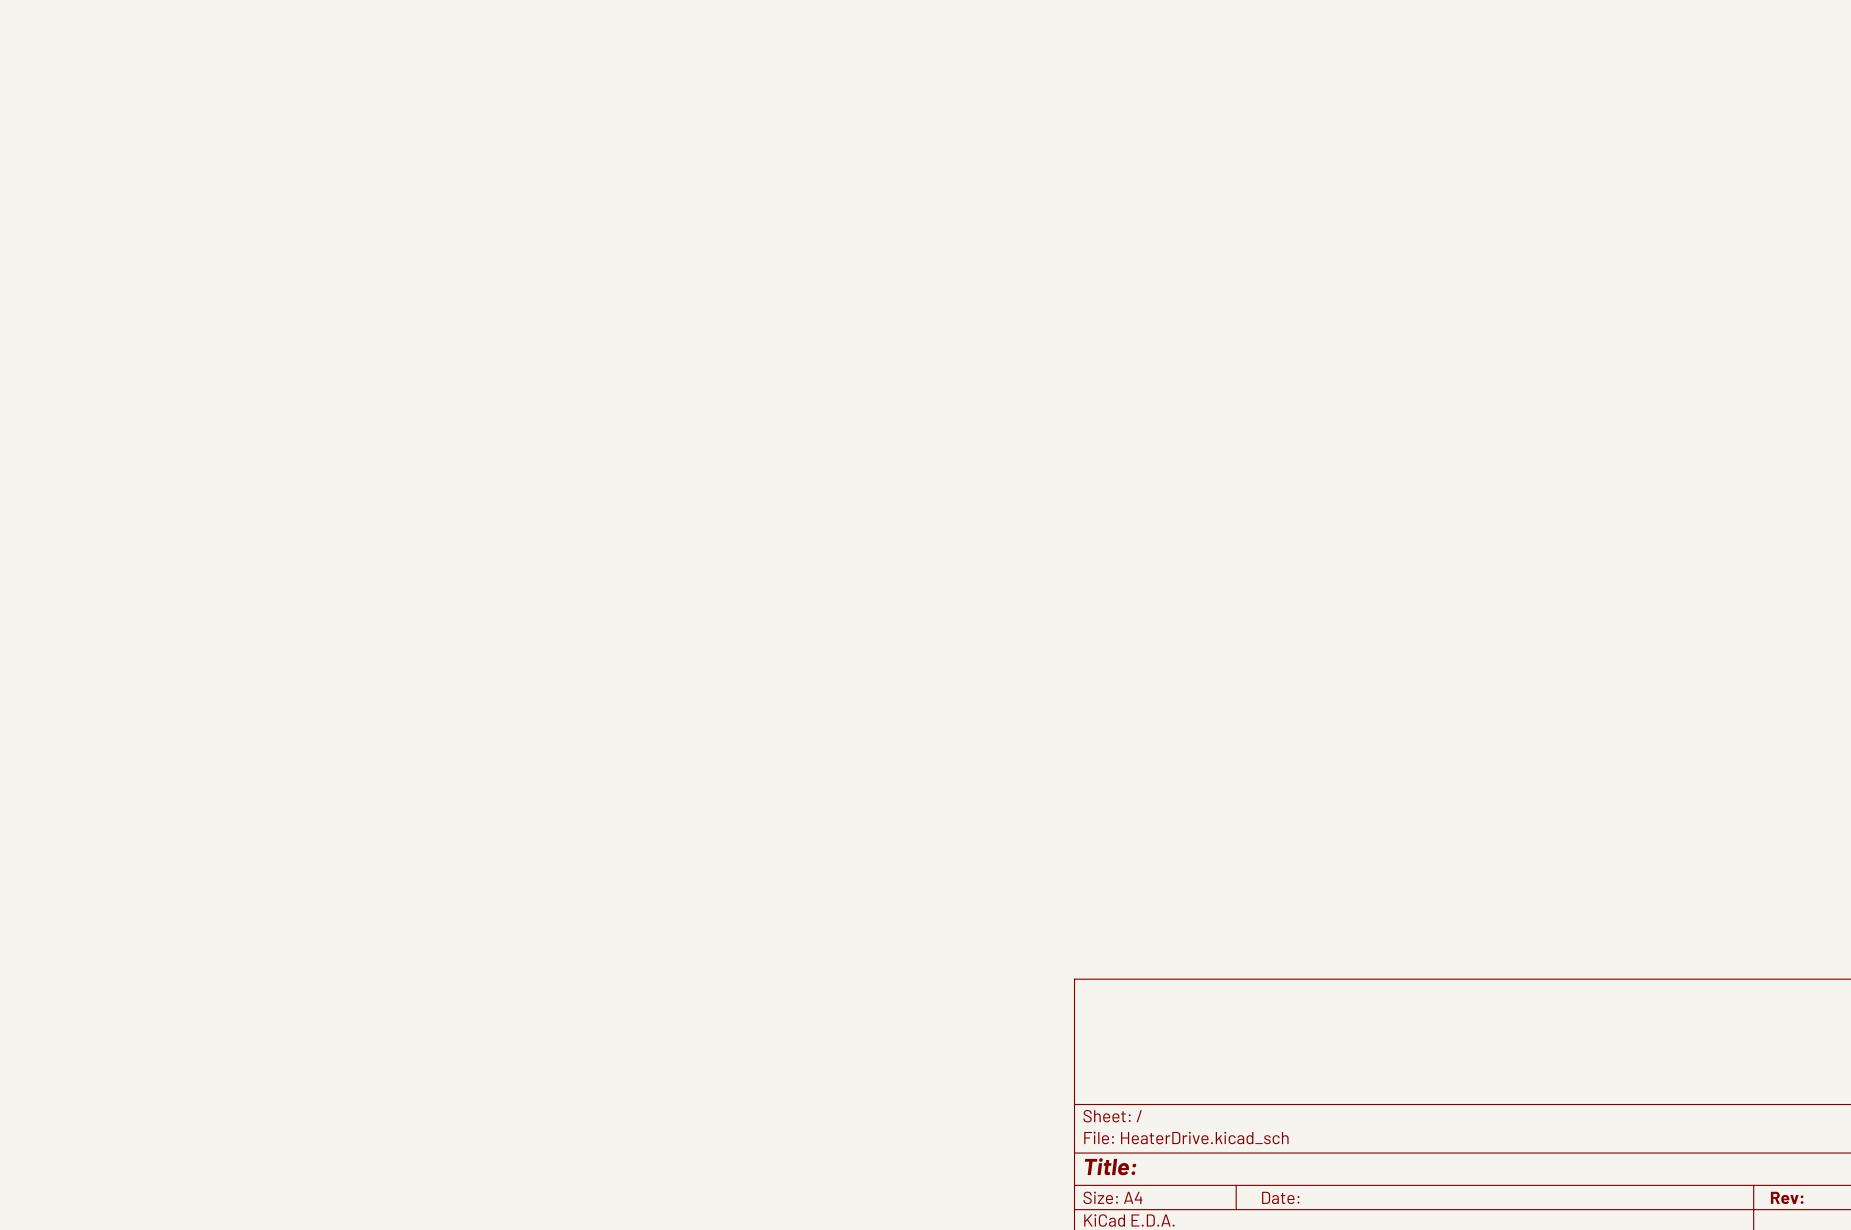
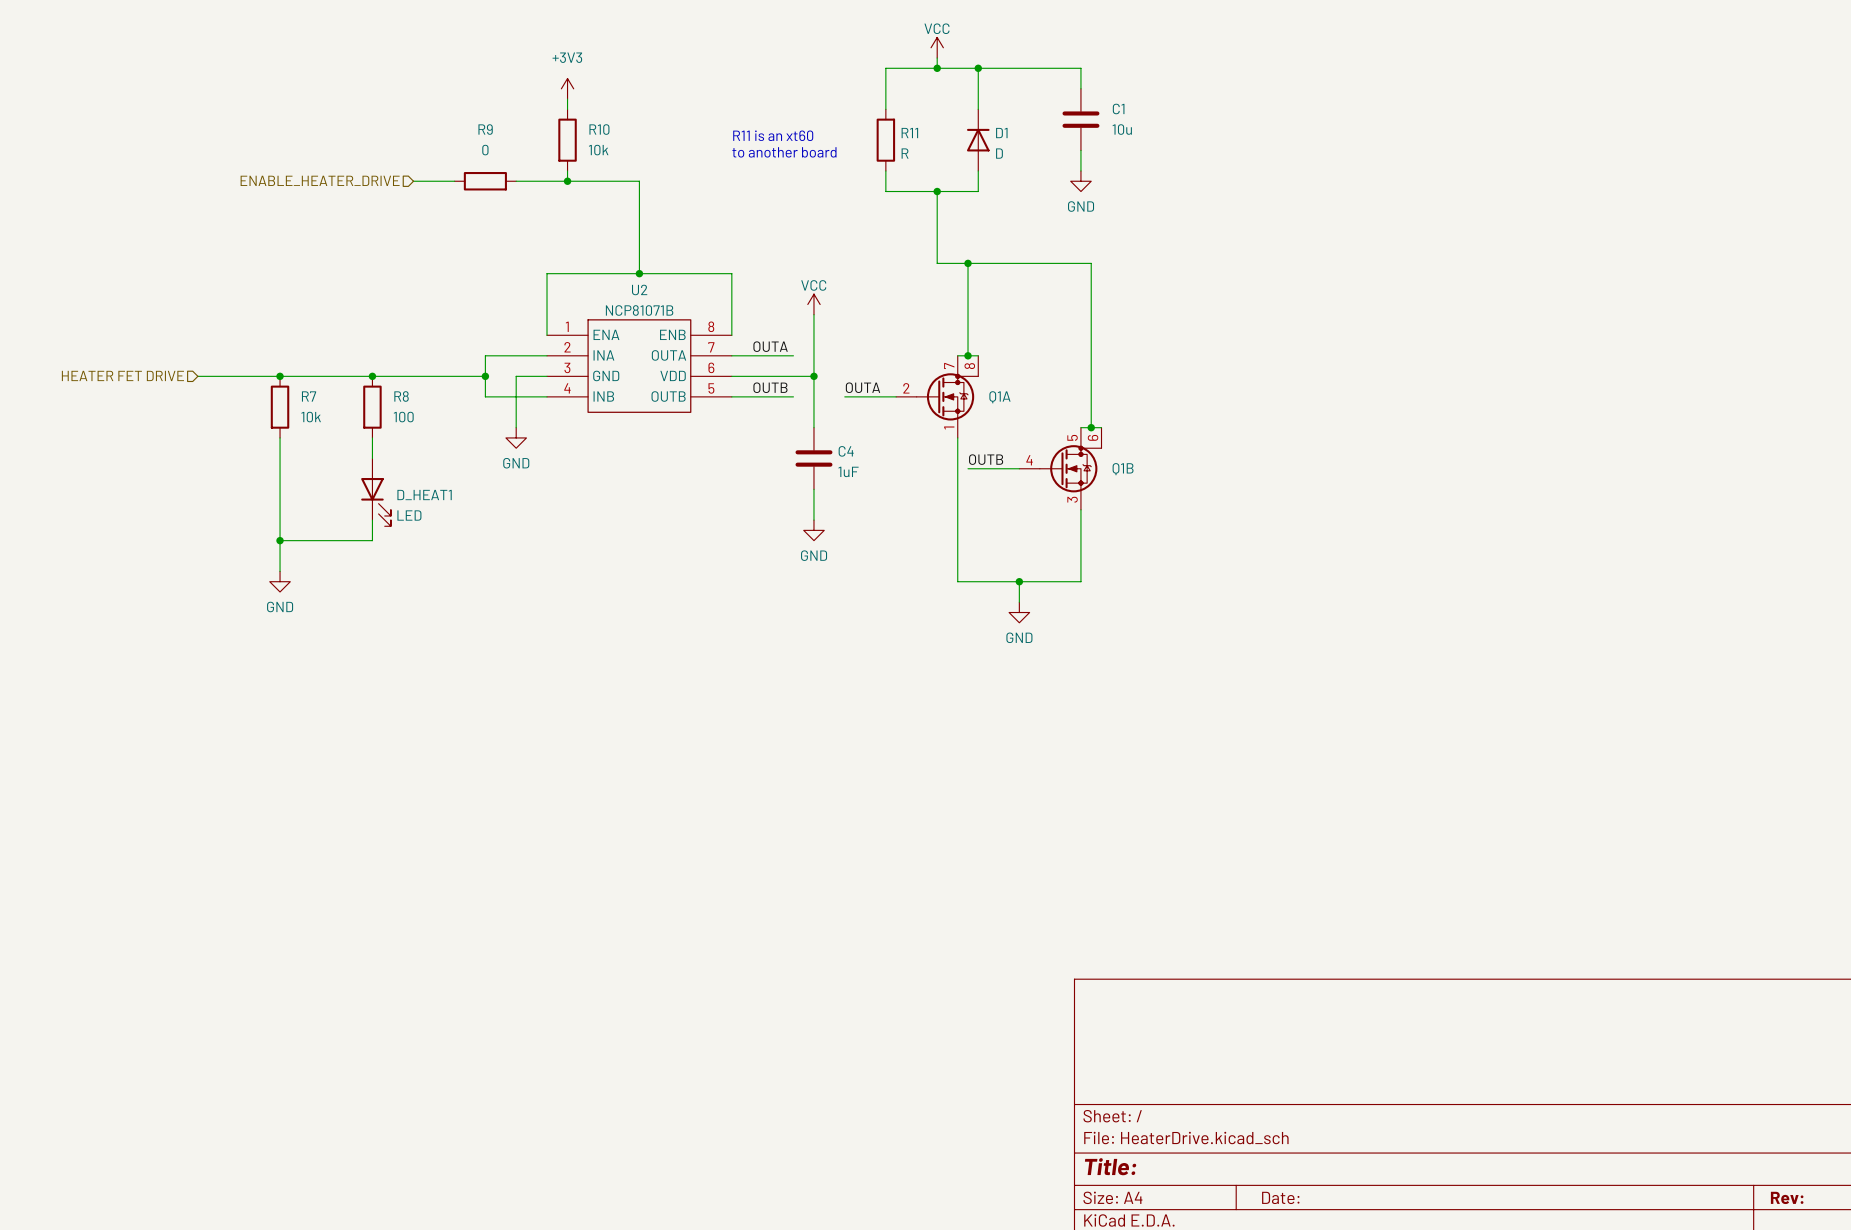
power symbol: none -> VCC (937, 47)
wire: none -> (937, 58) (937, 68)
junction: none -> (937, 68)
wire: none -> (978, 68) (978, 109)
junction: none -> (978, 68)
power symbol: none -> +3V3 (567, 88)
wire: none -> (1080, 88) (1080, 68) (885, 68) (885, 109)
wire: none -> (567, 99) (567, 109)
C1: none -> 10u (1080, 119)
text: none -> R11 is an xt60 (773, 135)
R10: none -> 10k (567, 140)
R11: none -> R (885, 140)
D1: none -> D (978, 140)
wire: none -> (1080, 150) (1080, 170)
text: none -> to another board (784, 152)
wire: none -> (567, 170) (567, 181)
wire: none -> (885, 170) (885, 191) (978, 191) (978, 170)
hierarchical label: none -> ENABLE_HEATER_DRIVE (320, 180)
wire: none -> (413, 181) (454, 181)
R9: none -> 0 (485, 181)
wire: none -> (516, 181) (639, 181) (639, 273)
junction: none -> (567, 181)
power symbol: none -> GND (1080, 181)
wire: none -> (937, 191) (937, 263) (1091, 263) (1091, 427)
junction: none -> (937, 191)
wire: none -> (968, 263) (968, 355)
junction: none -> (968, 263)
junction: none -> (639, 273)
power symbol: none -> VCC (813, 304)
wire: none -> (813, 314) (813, 427)
wire: none -> (547, 335) (547, 273) (731, 273) (731, 335)
label: none -> OUTA (770, 346)
wire: none -> (547, 355) (485, 355) (485, 396) (547, 396)
wire: none -> (731, 355) (793, 355)
wire: none -> (957, 355) (978, 355)
junction: none -> (968, 355)
U2: none -> NCP81071B (639, 366)
hierarchical label: none -> HEATER FET DRIVE (122, 375)
wire: none -> (197, 376) (485, 376)
junction: none -> (280, 376)
junction: none -> (372, 376)
junction: none -> (485, 376)
wire: none -> (547, 376) (516, 376) (516, 427)
wire: none -> (731, 376) (813, 376)
junction: none -> (813, 376)
label: none -> OUTB (770, 387)
label: none -> OUTA (863, 387)
wire: none -> (731, 396) (793, 396)
wire: none -> (844, 396) (896, 396)
Q1A: none -> (937, 396)
R7: none -> 10k (280, 407)
R8: none -> 100 (372, 407)
wire: none -> (1080, 427) (1101, 427)
junction: none -> (1091, 427)
wire: none -> (280, 437) (280, 571)
wire: none -> (372, 437) (372, 458)
power symbol: none -> GND (516, 437)
wire: none -> (957, 437) (957, 581) (1080, 581) (1080, 509)
C4: none -> 1uF (813, 458)
label: none -> OUTB (986, 459)
wire: none -> (968, 468) (1019, 468)
Q1B: none -> (1060, 468)
wire: none -> (813, 489) (813, 520)
D_HEAT1: none -> LED (376, 492)
wire: none -> (372, 520) (372, 540) (280, 540)
power symbol: none -> GND (813, 530)
junction: none -> (280, 540)
power symbol: none -> GND (280, 581)
wire: none -> (1019, 581) (1019, 602)
junction: none -> (1019, 581)
power symbol: none -> GND (1019, 612)

